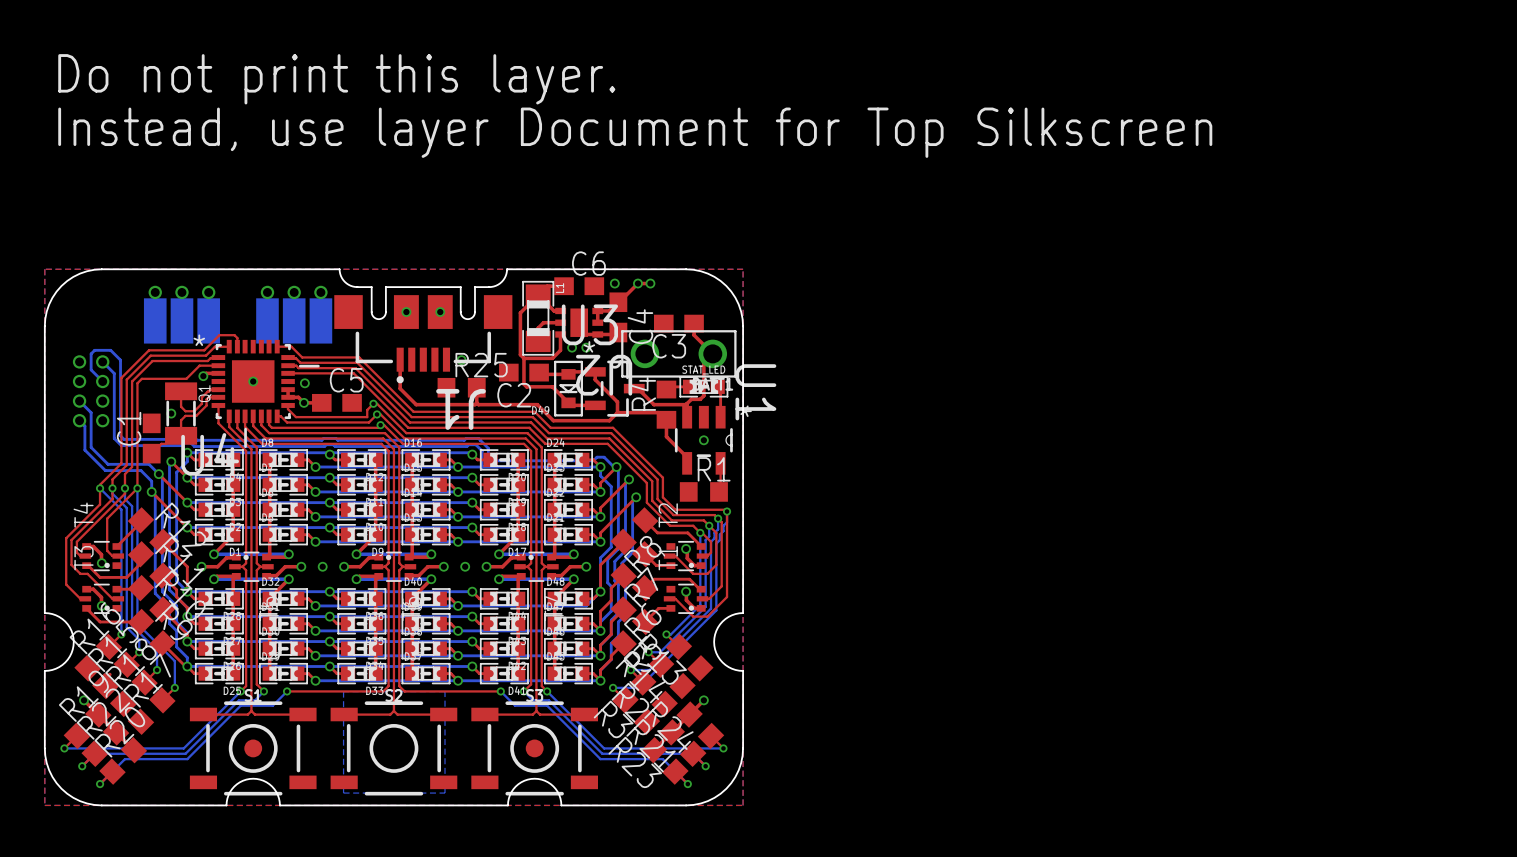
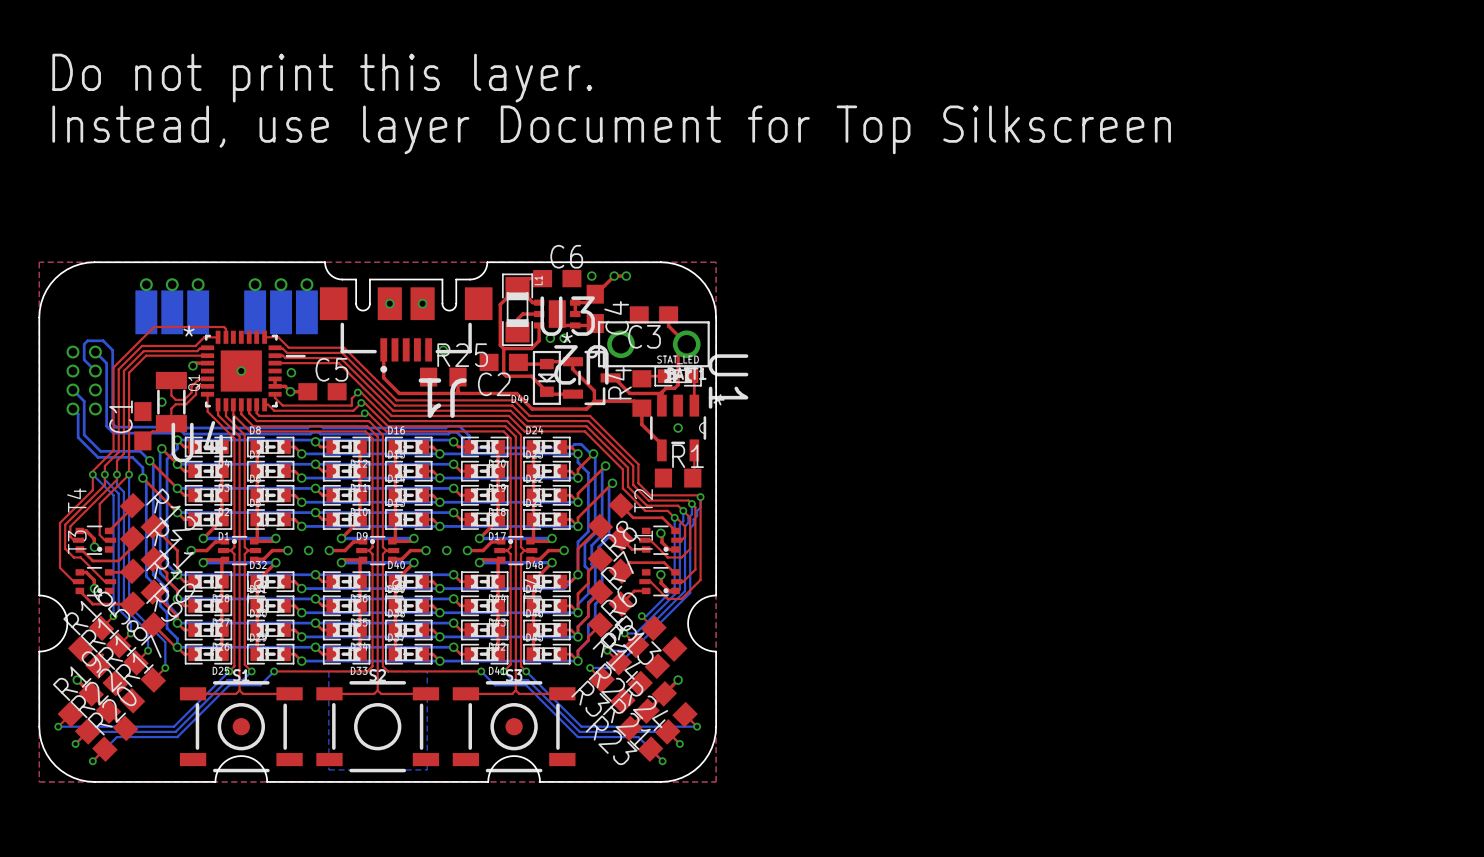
top track: (235, 336) (219, 335) (204, 350) (149, 350) -> (224, 327) (154, 327) (140, 340)
top track: (199, 365) (186, 378) (141, 378) -> (189, 355) (146, 355) (133, 368)

